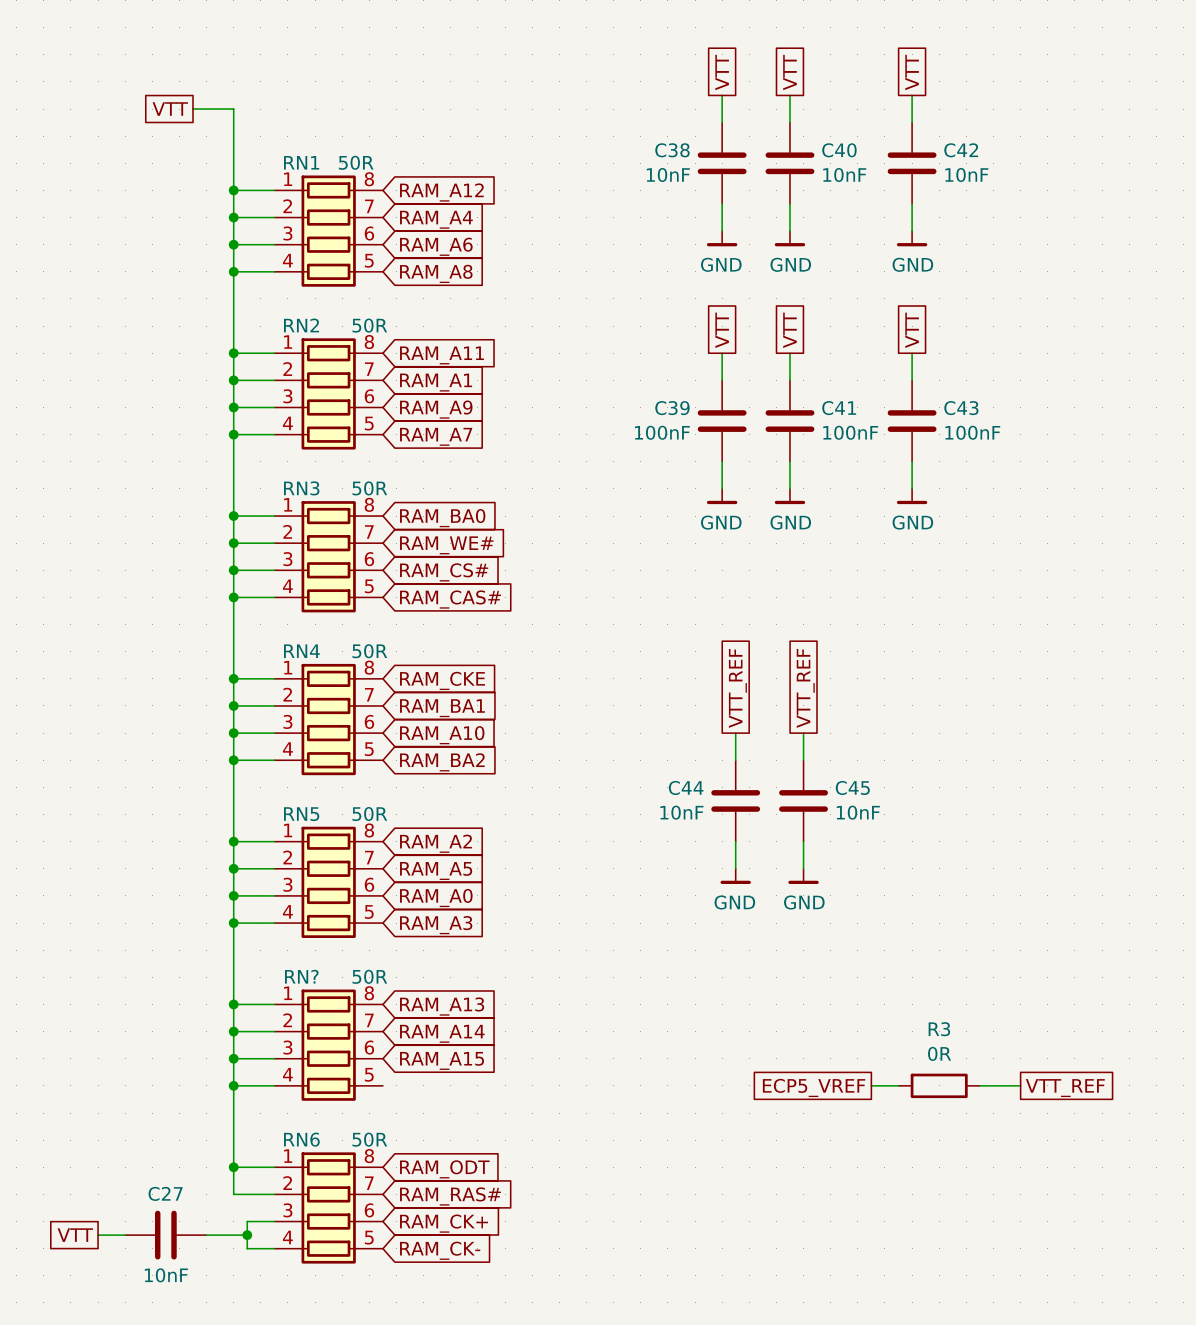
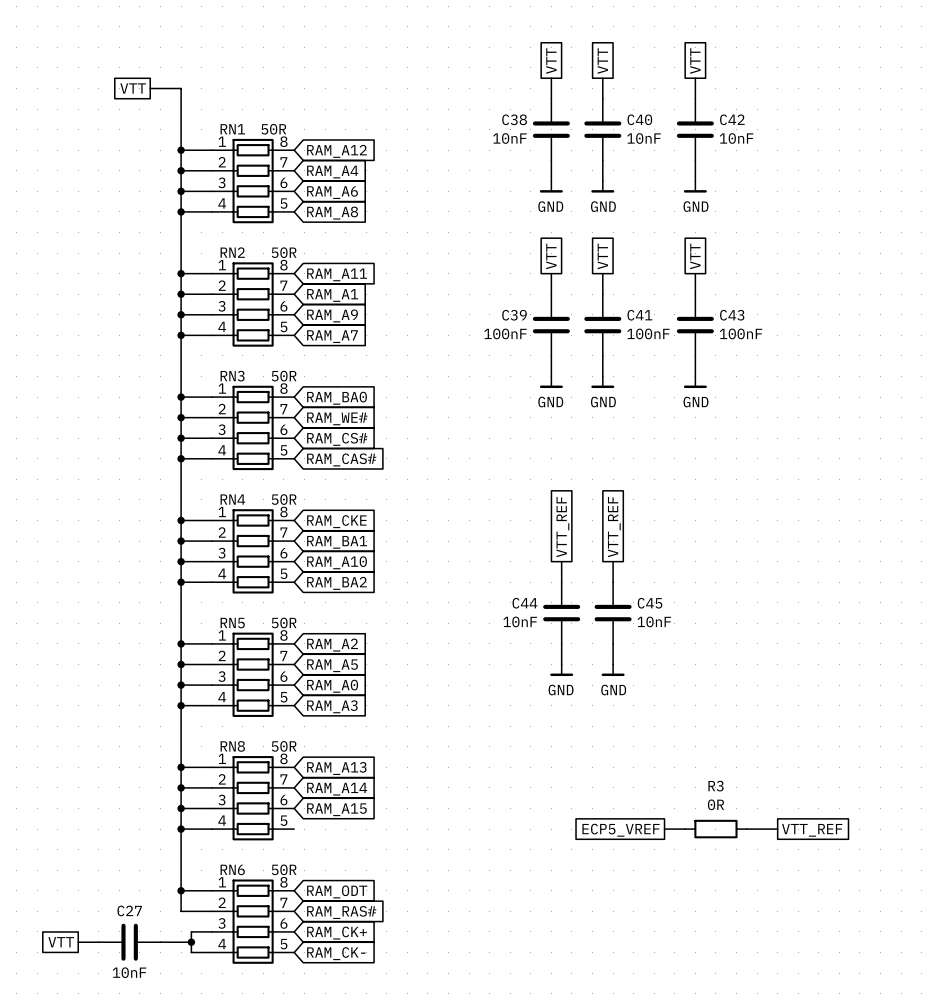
RN? name: RN? (301, 976) -> RN8 (232, 746)

